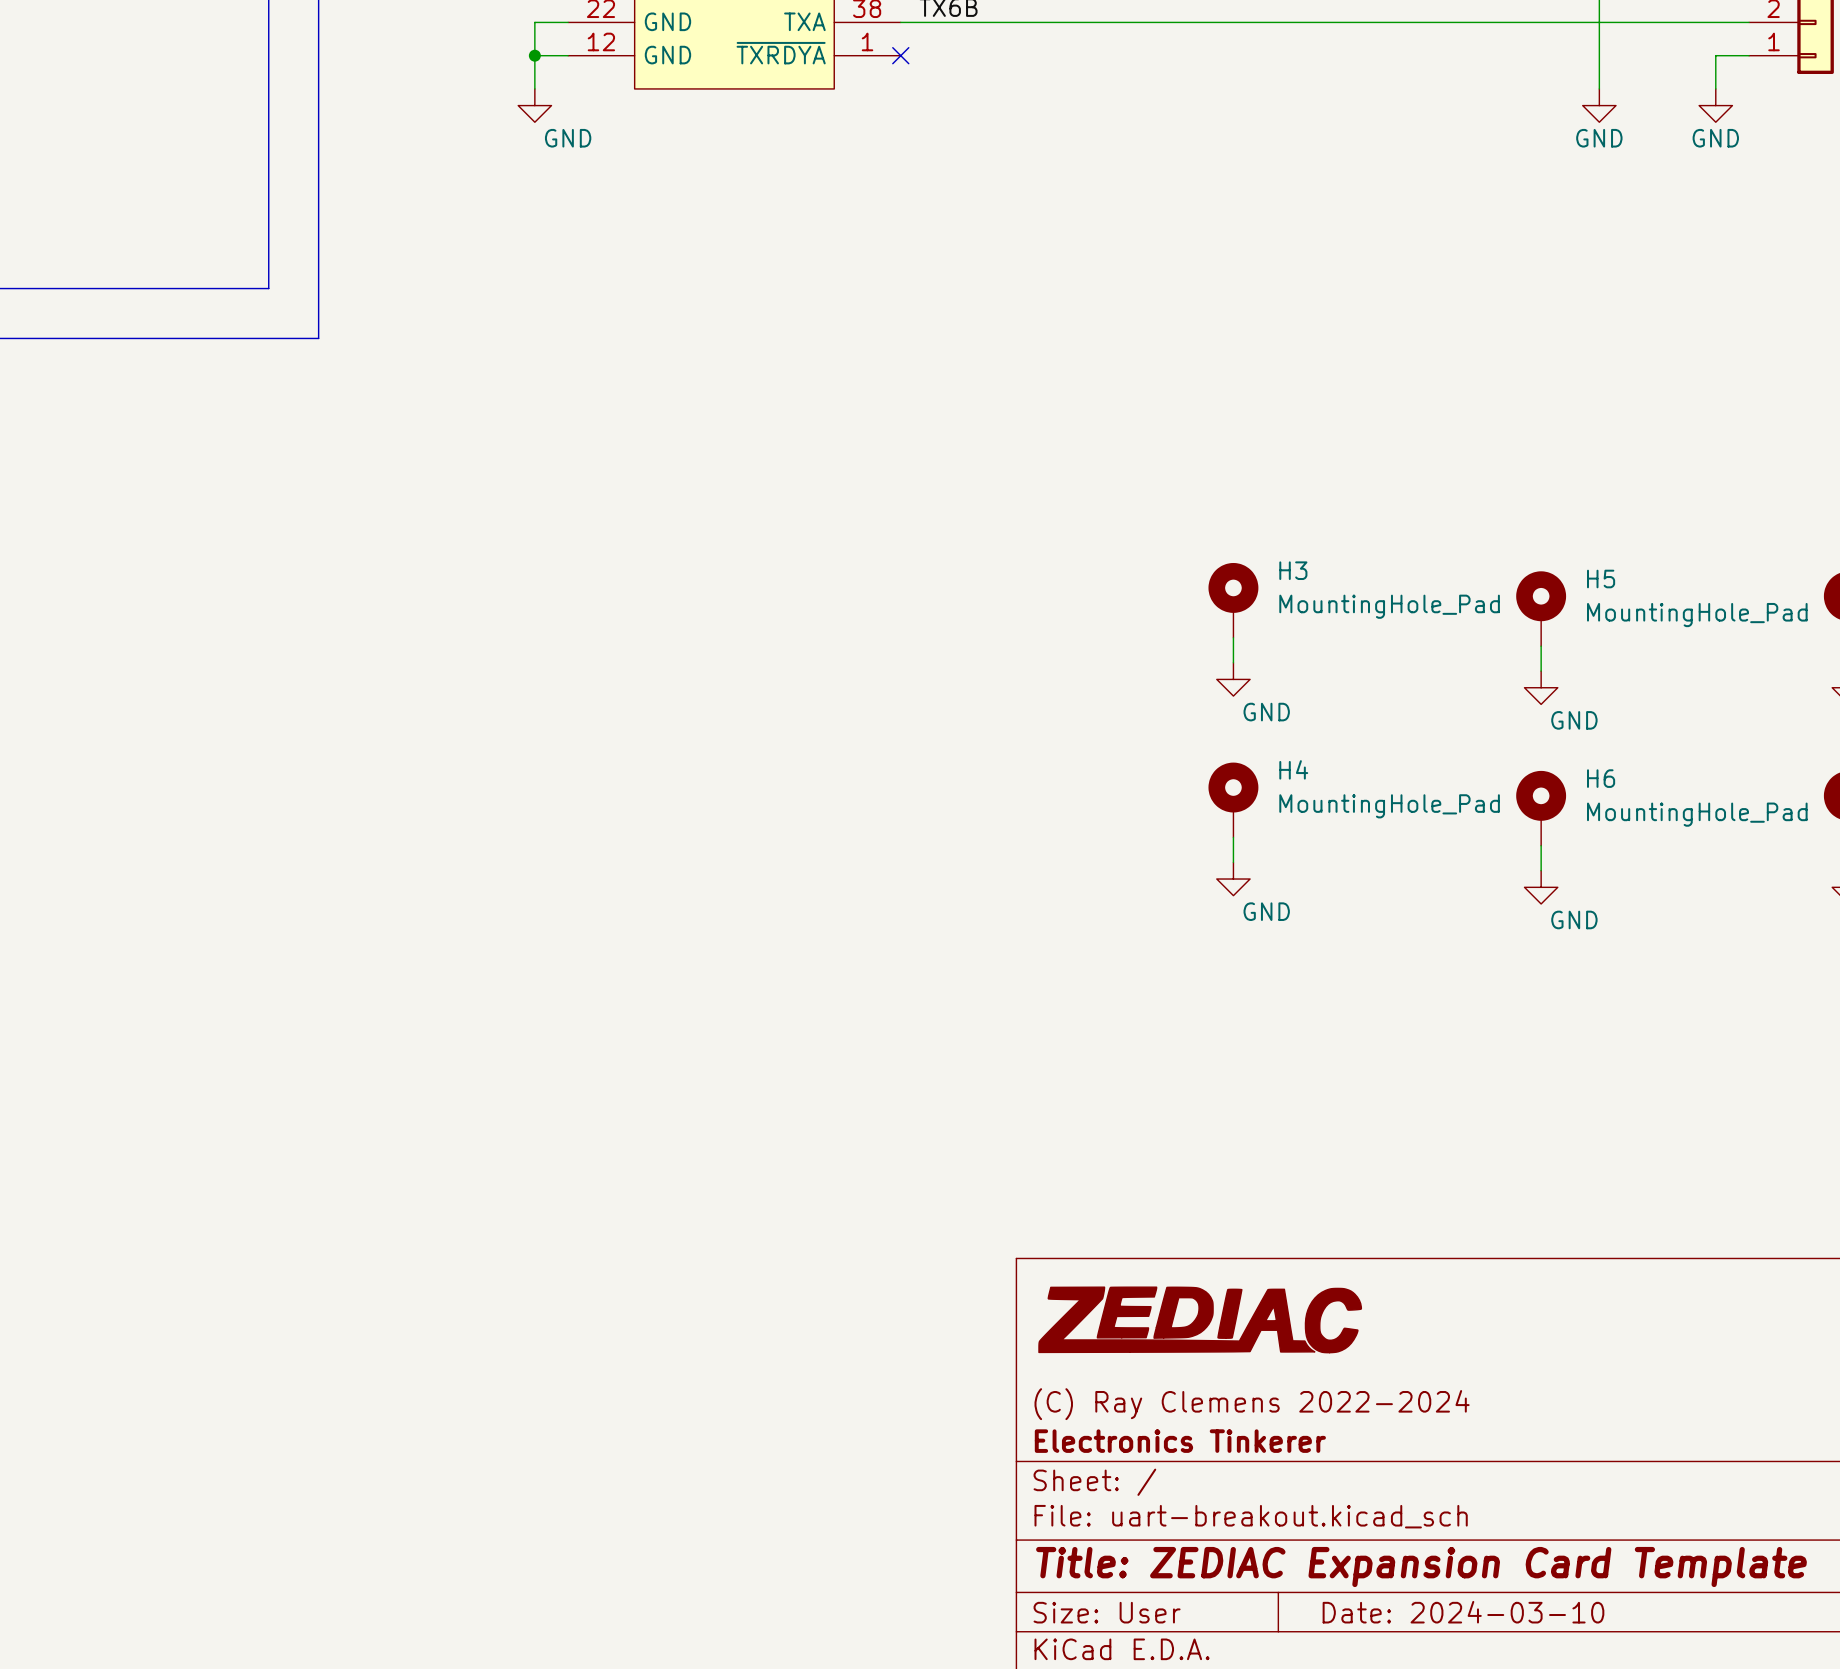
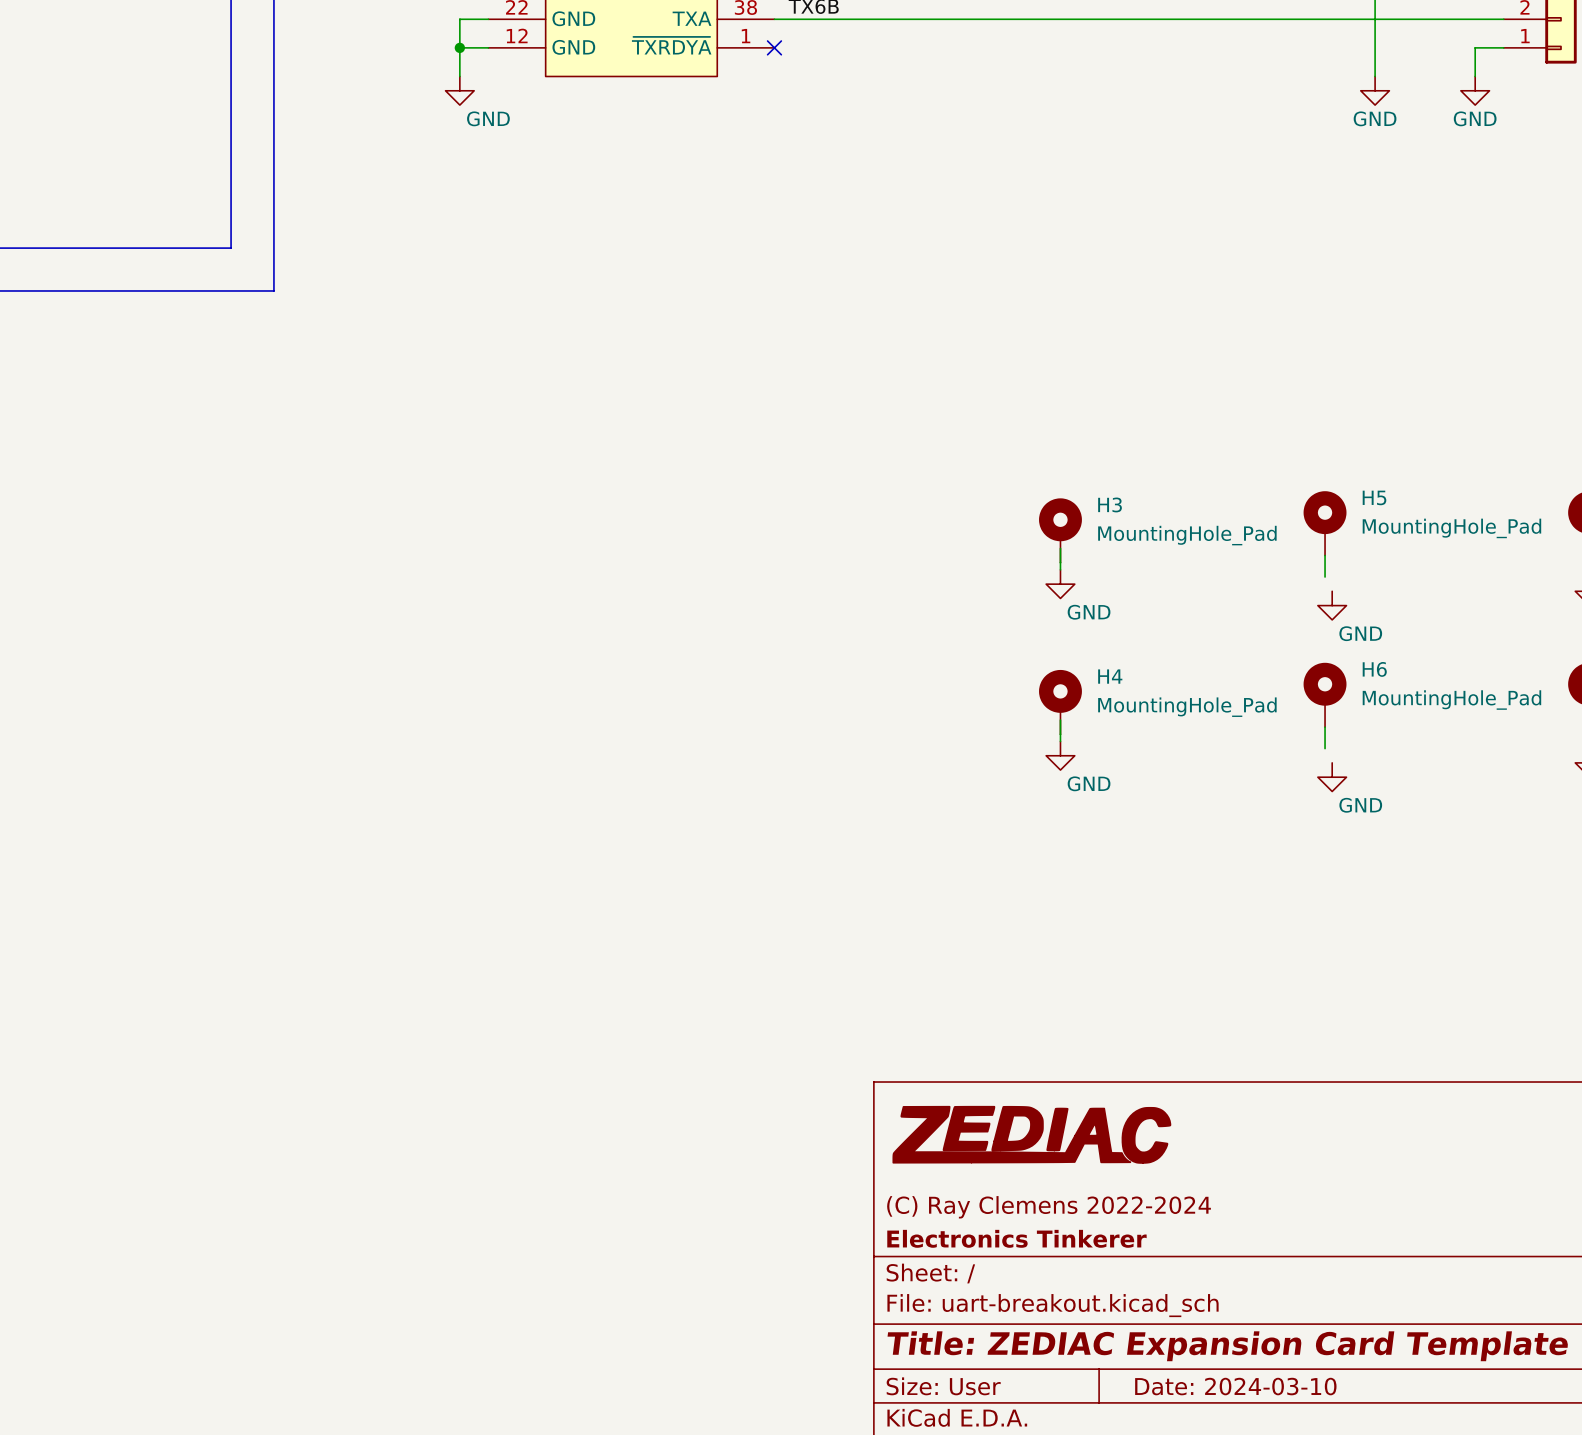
H3 position: (1233, 600) -> (1060, 530)
power symbol position: GND (1541, 687) -> GND (1332, 605)
H4 position: (1233, 800) -> (1060, 702)
power symbol position: GND (1541, 887) -> GND (1332, 777)

